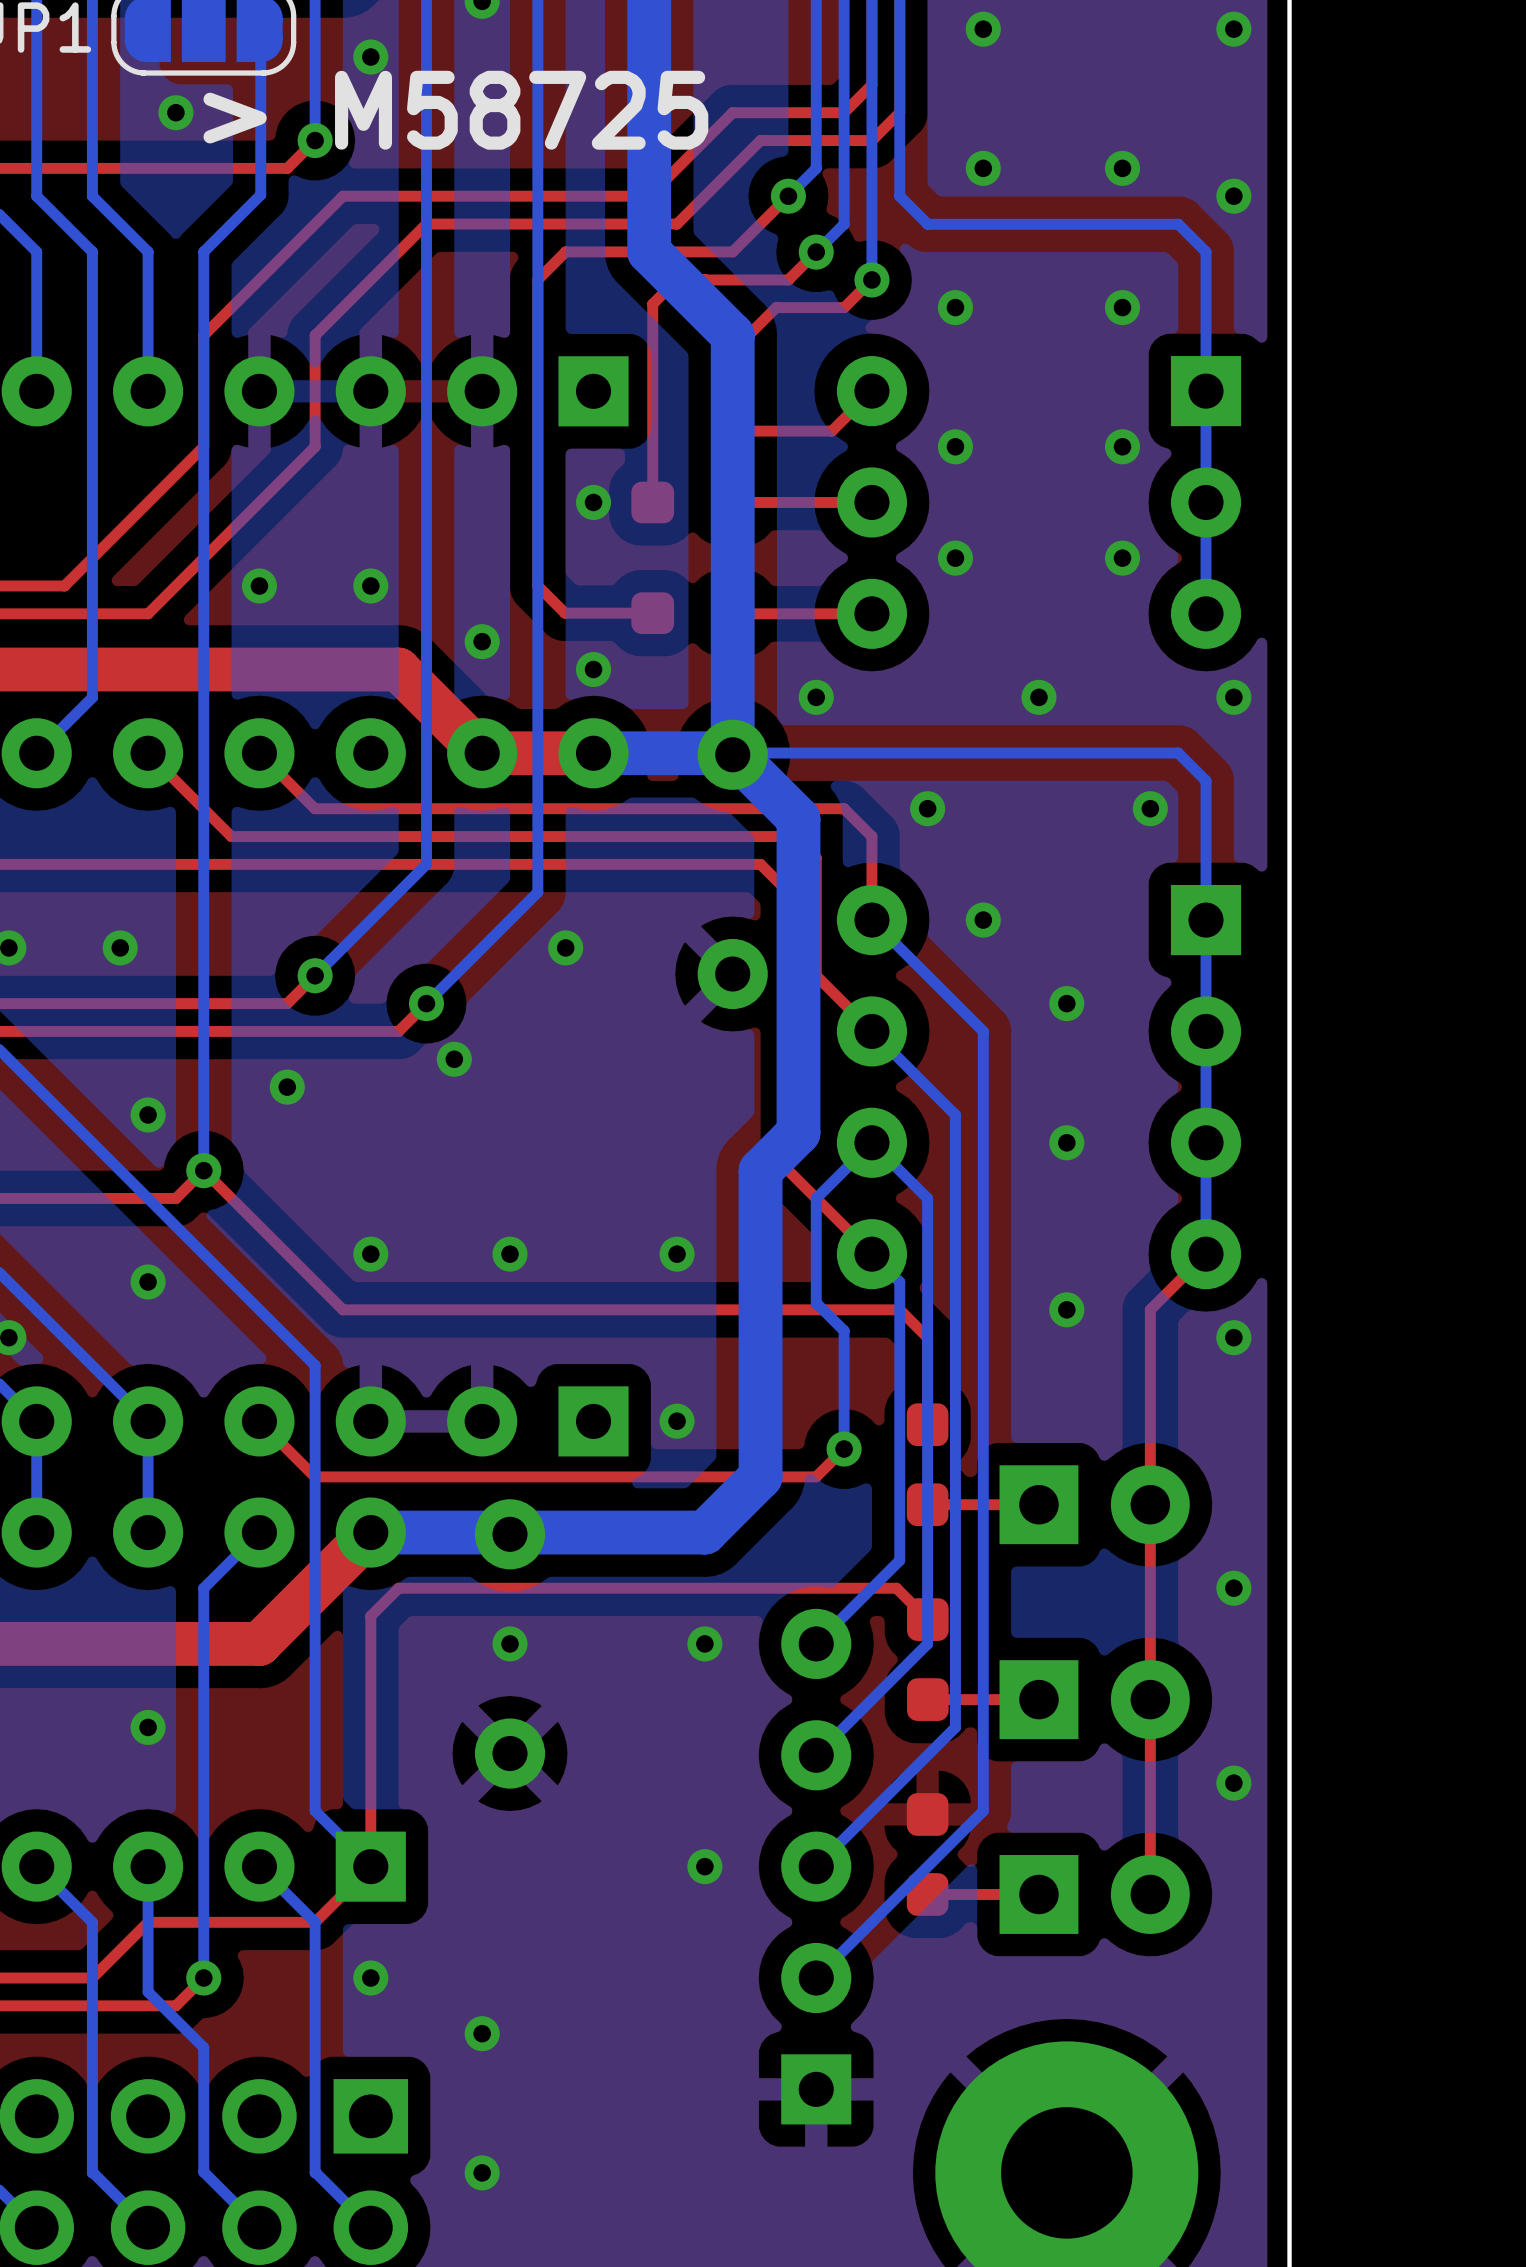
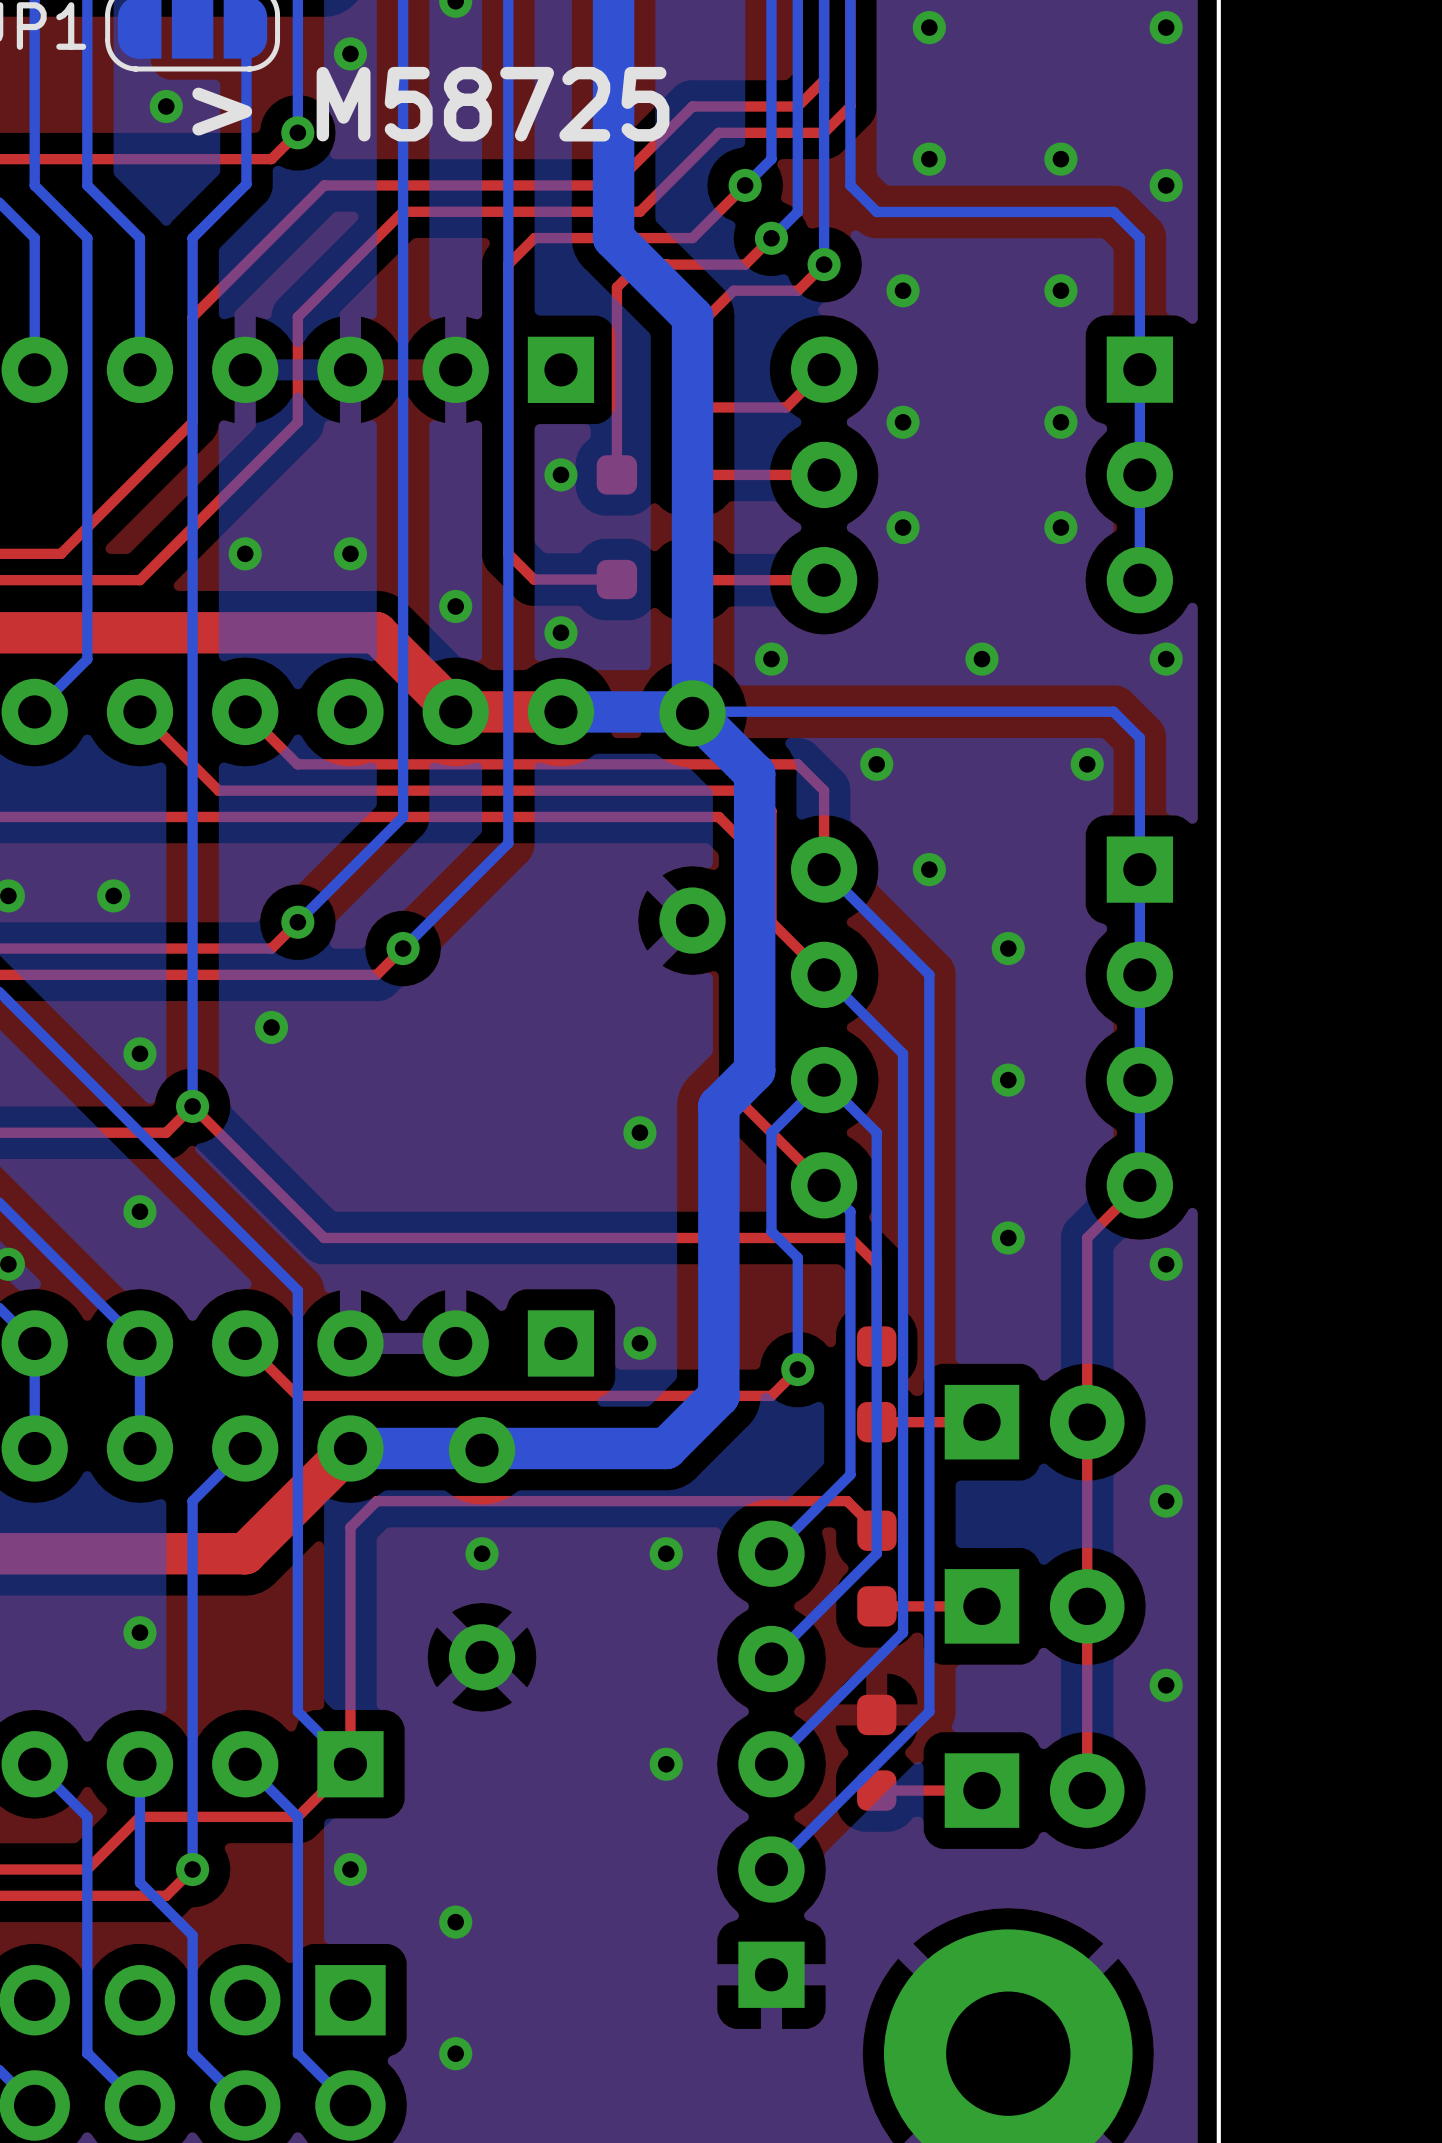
via: (565, 947) -> none
via: (454, 1059) -> none
via: (370, 1254) -> none
via: (510, 1254) -> none
via position: (677, 1254) -> (639, 1132)

